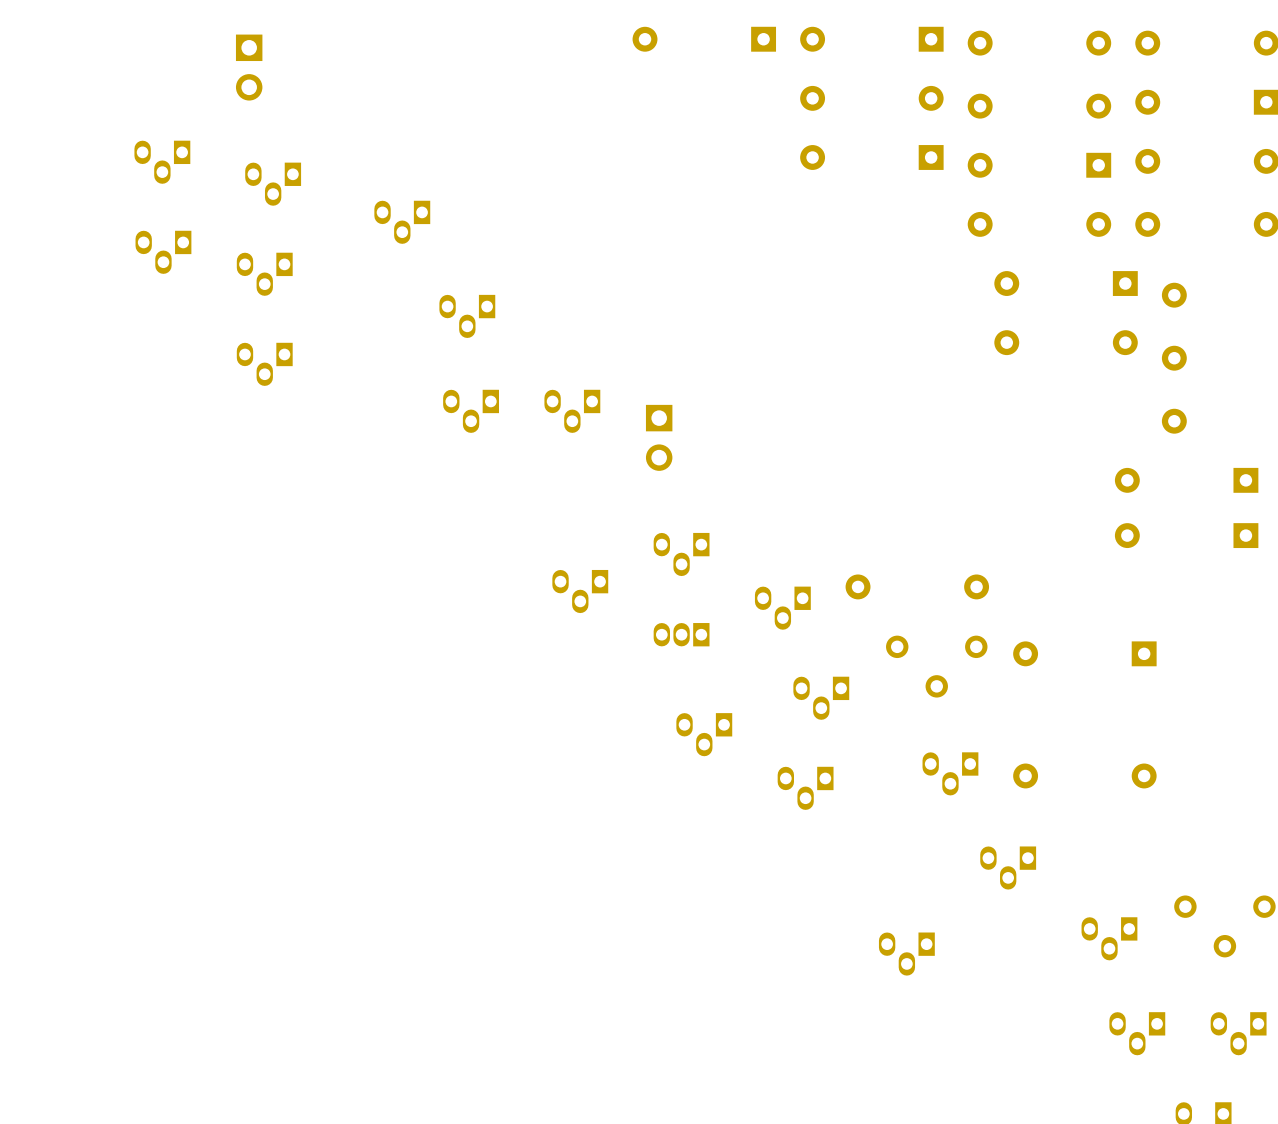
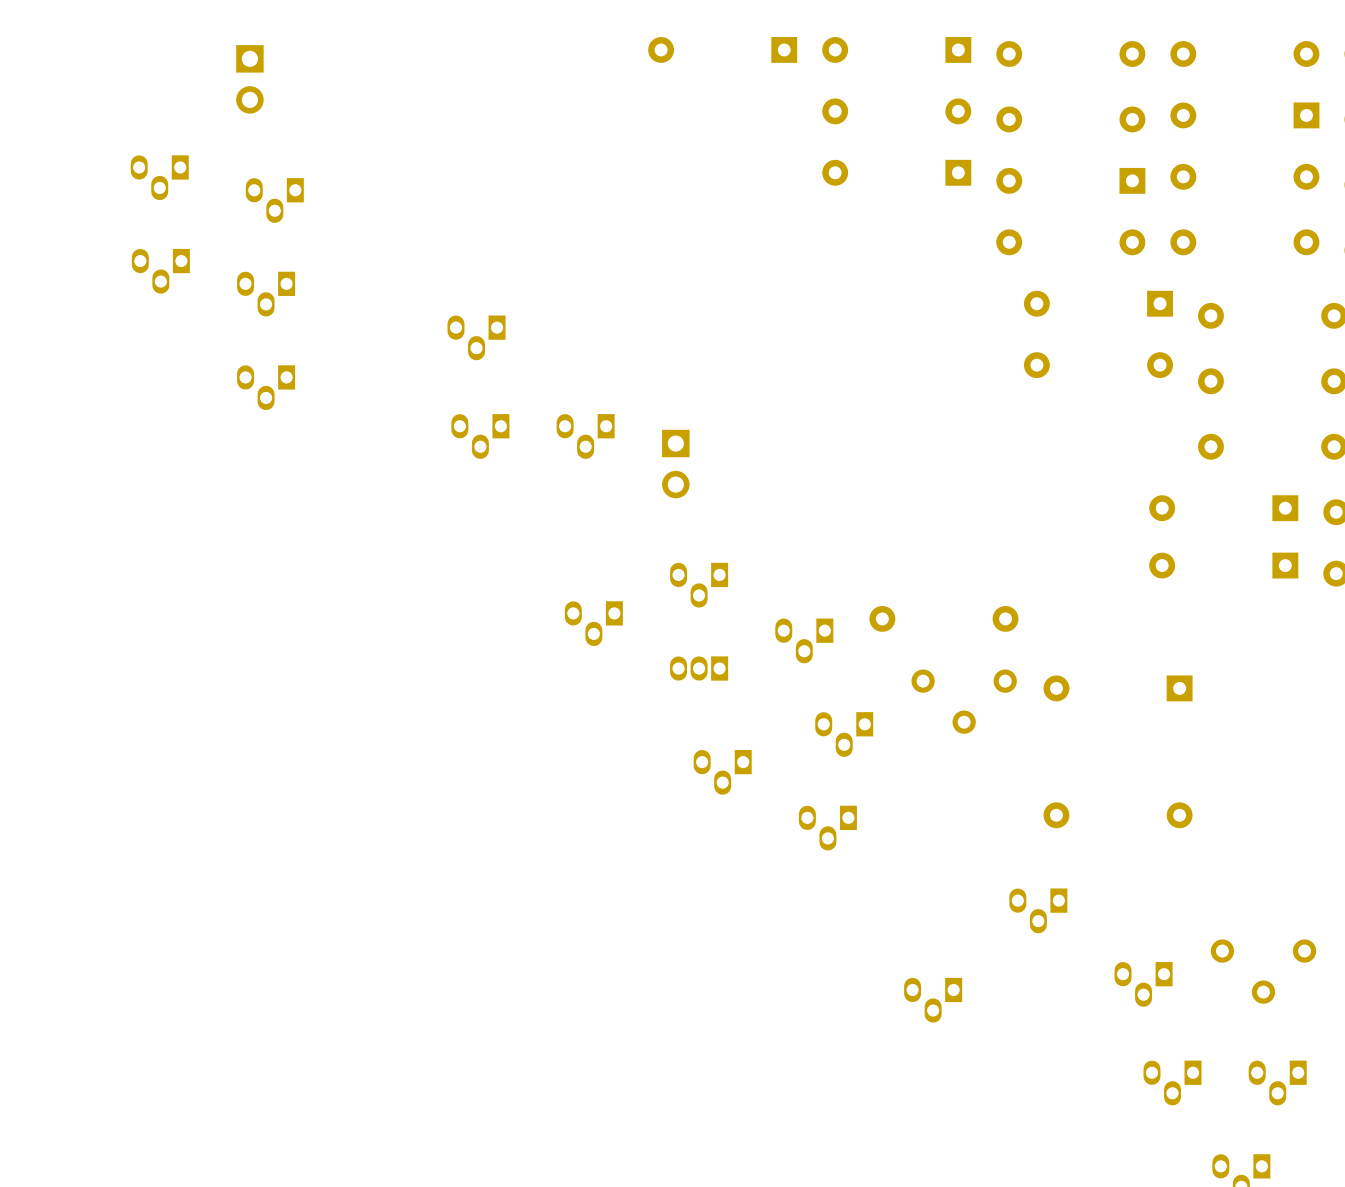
part: (402, 222) -> none
part: (950, 773) -> none

